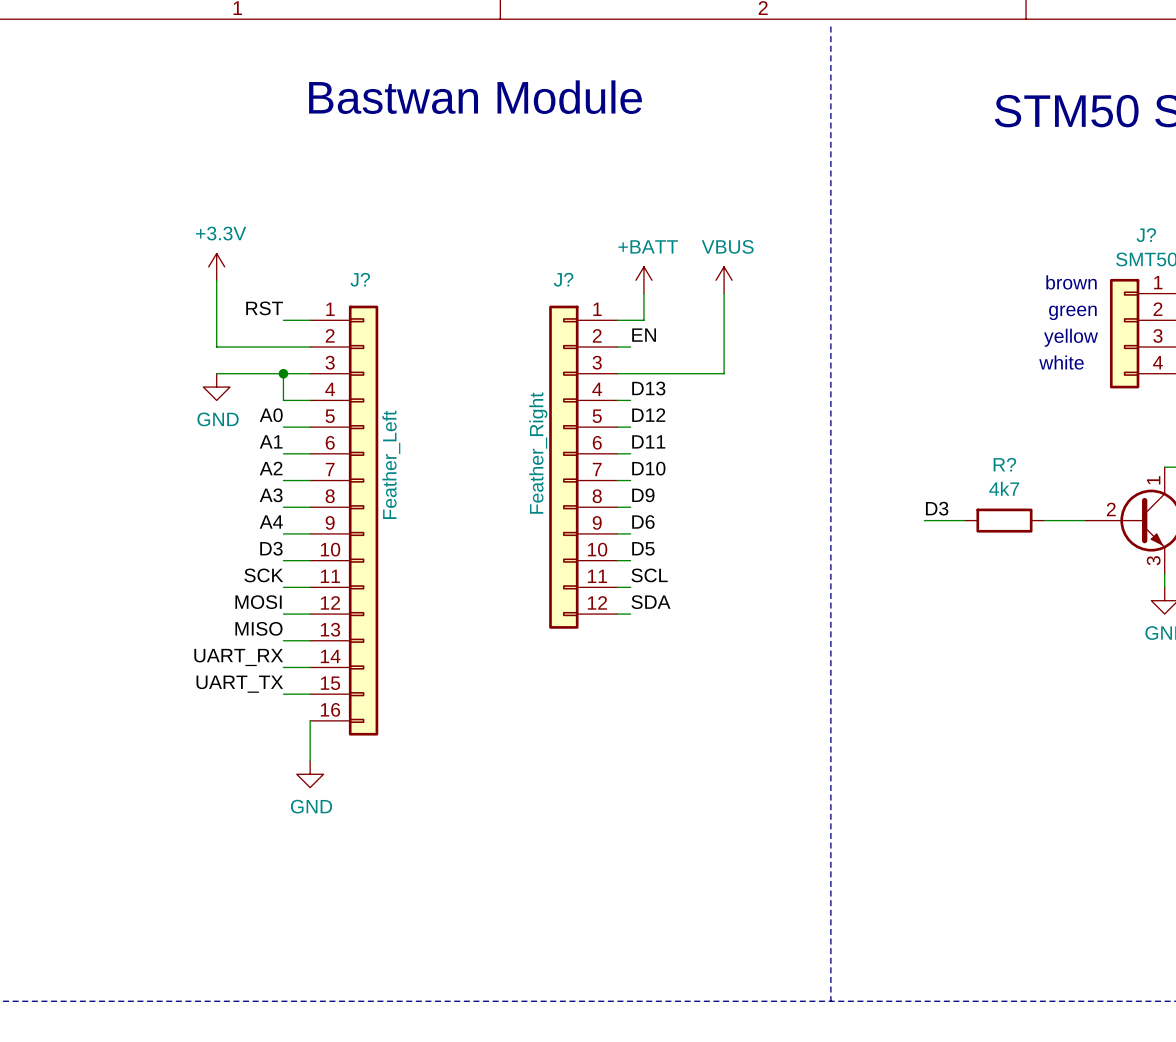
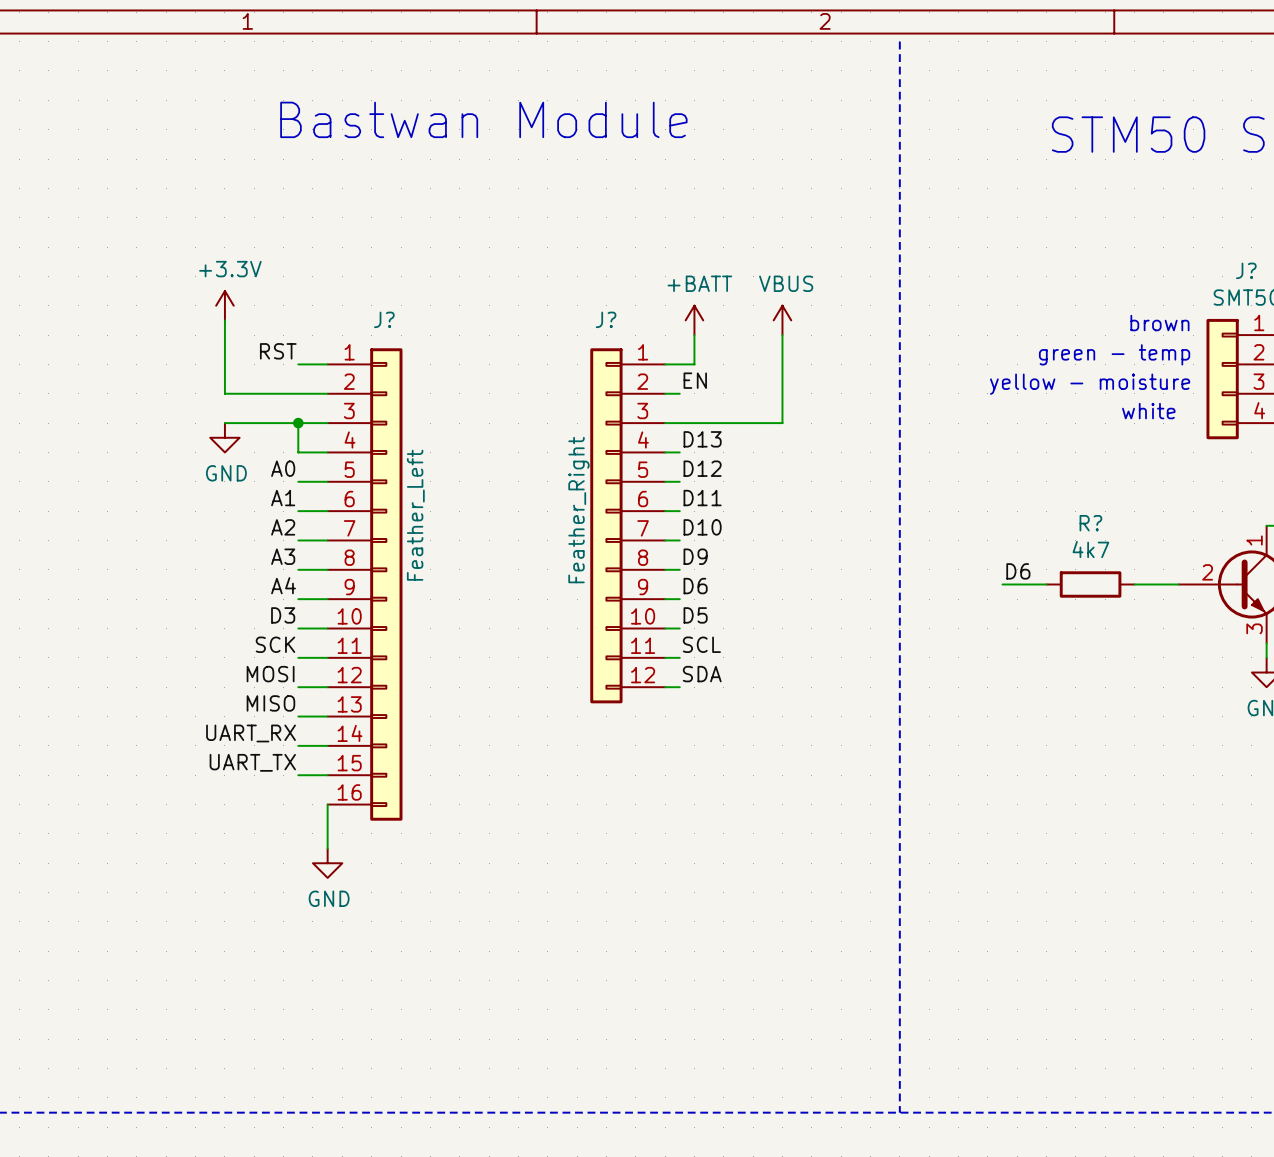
text: green (1072, 312) -> green - temp (1114, 354)
text: yellow (1071, 337) -> yellow - moisture (1090, 384)
label: D3 (937, 508) -> D6 (1018, 571)

